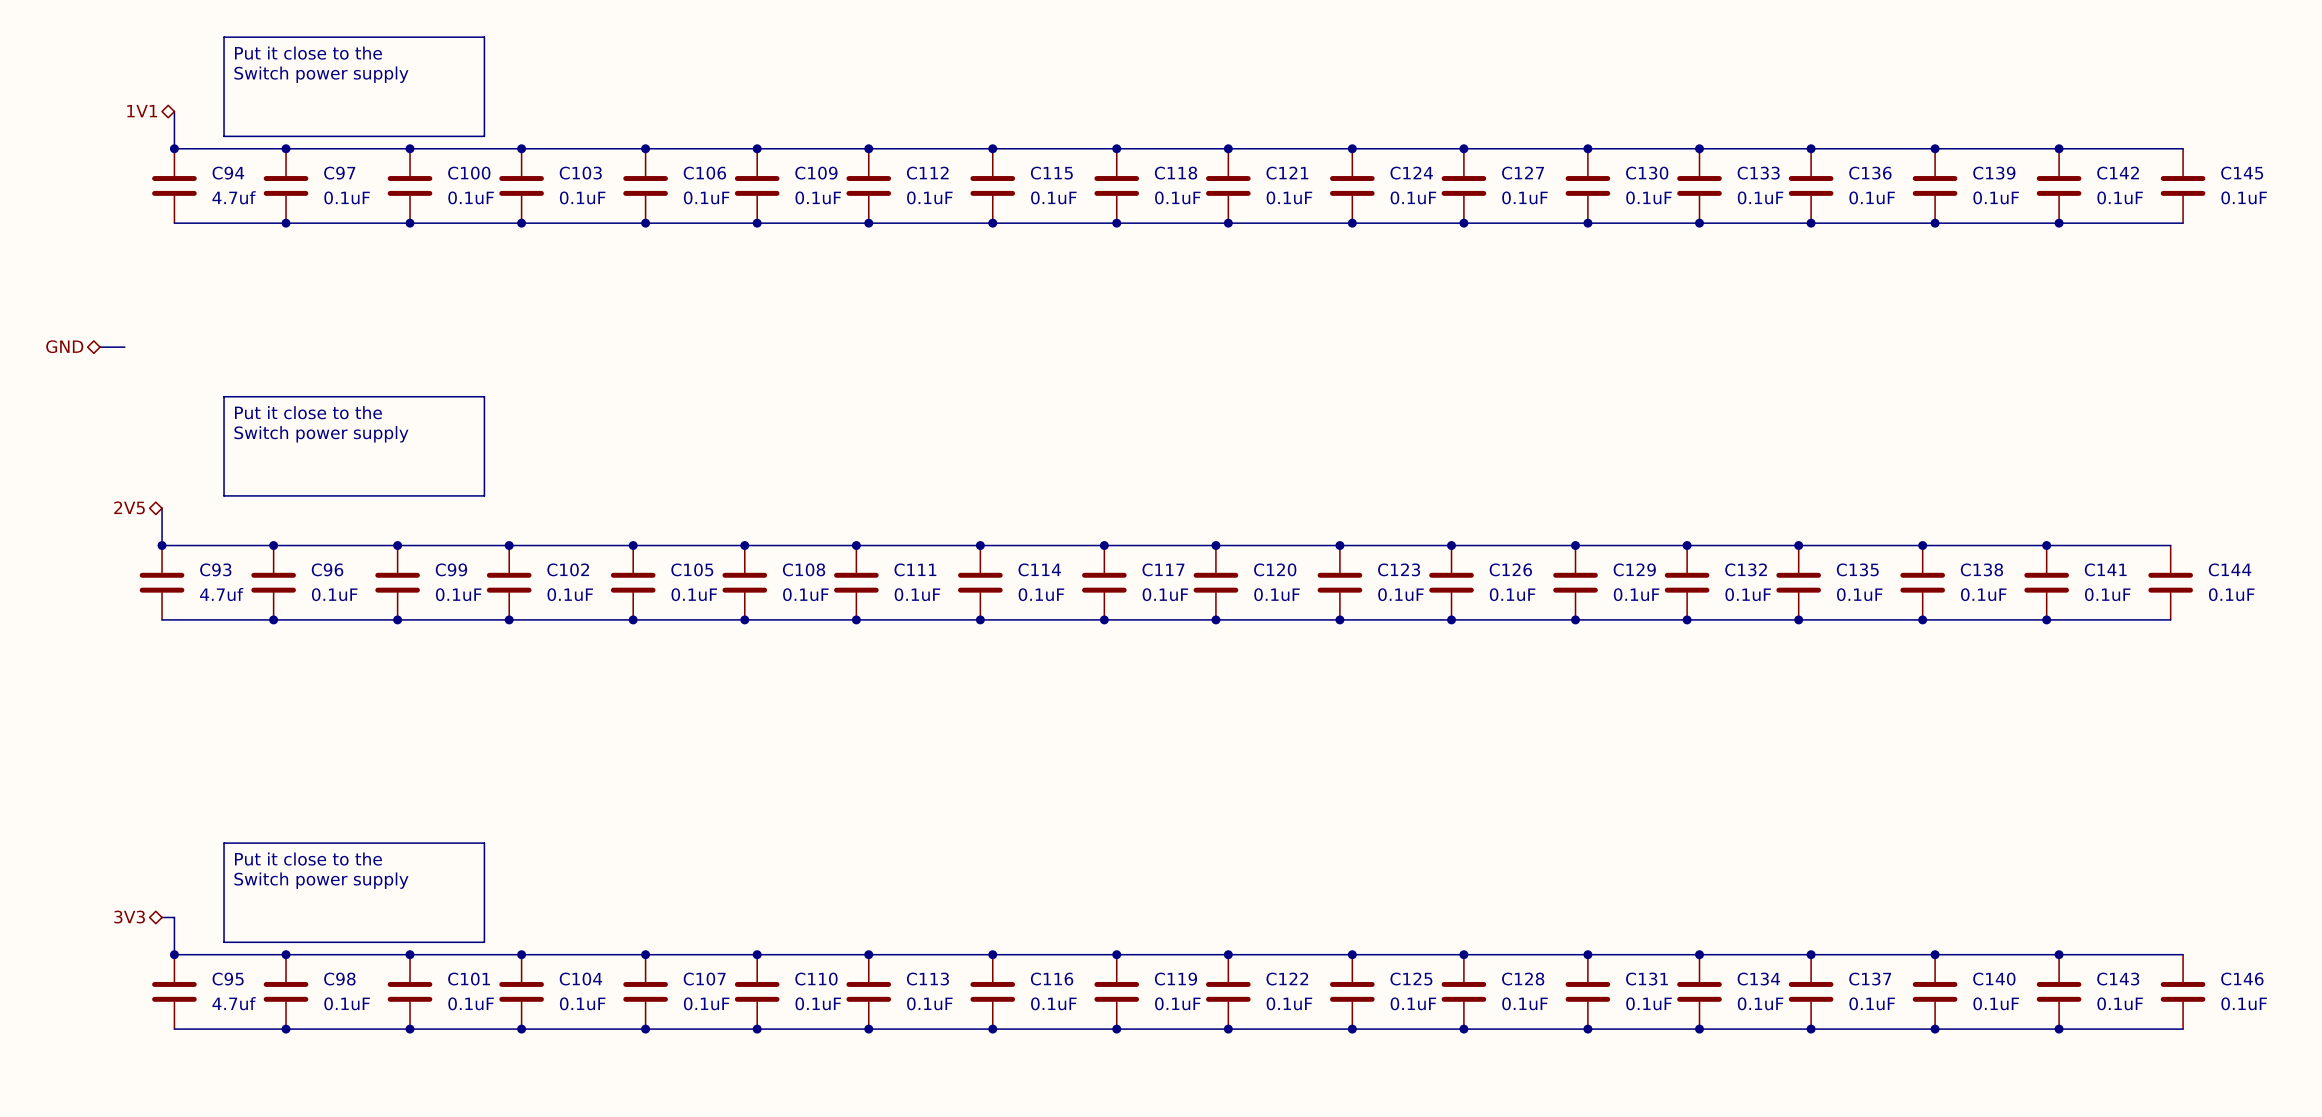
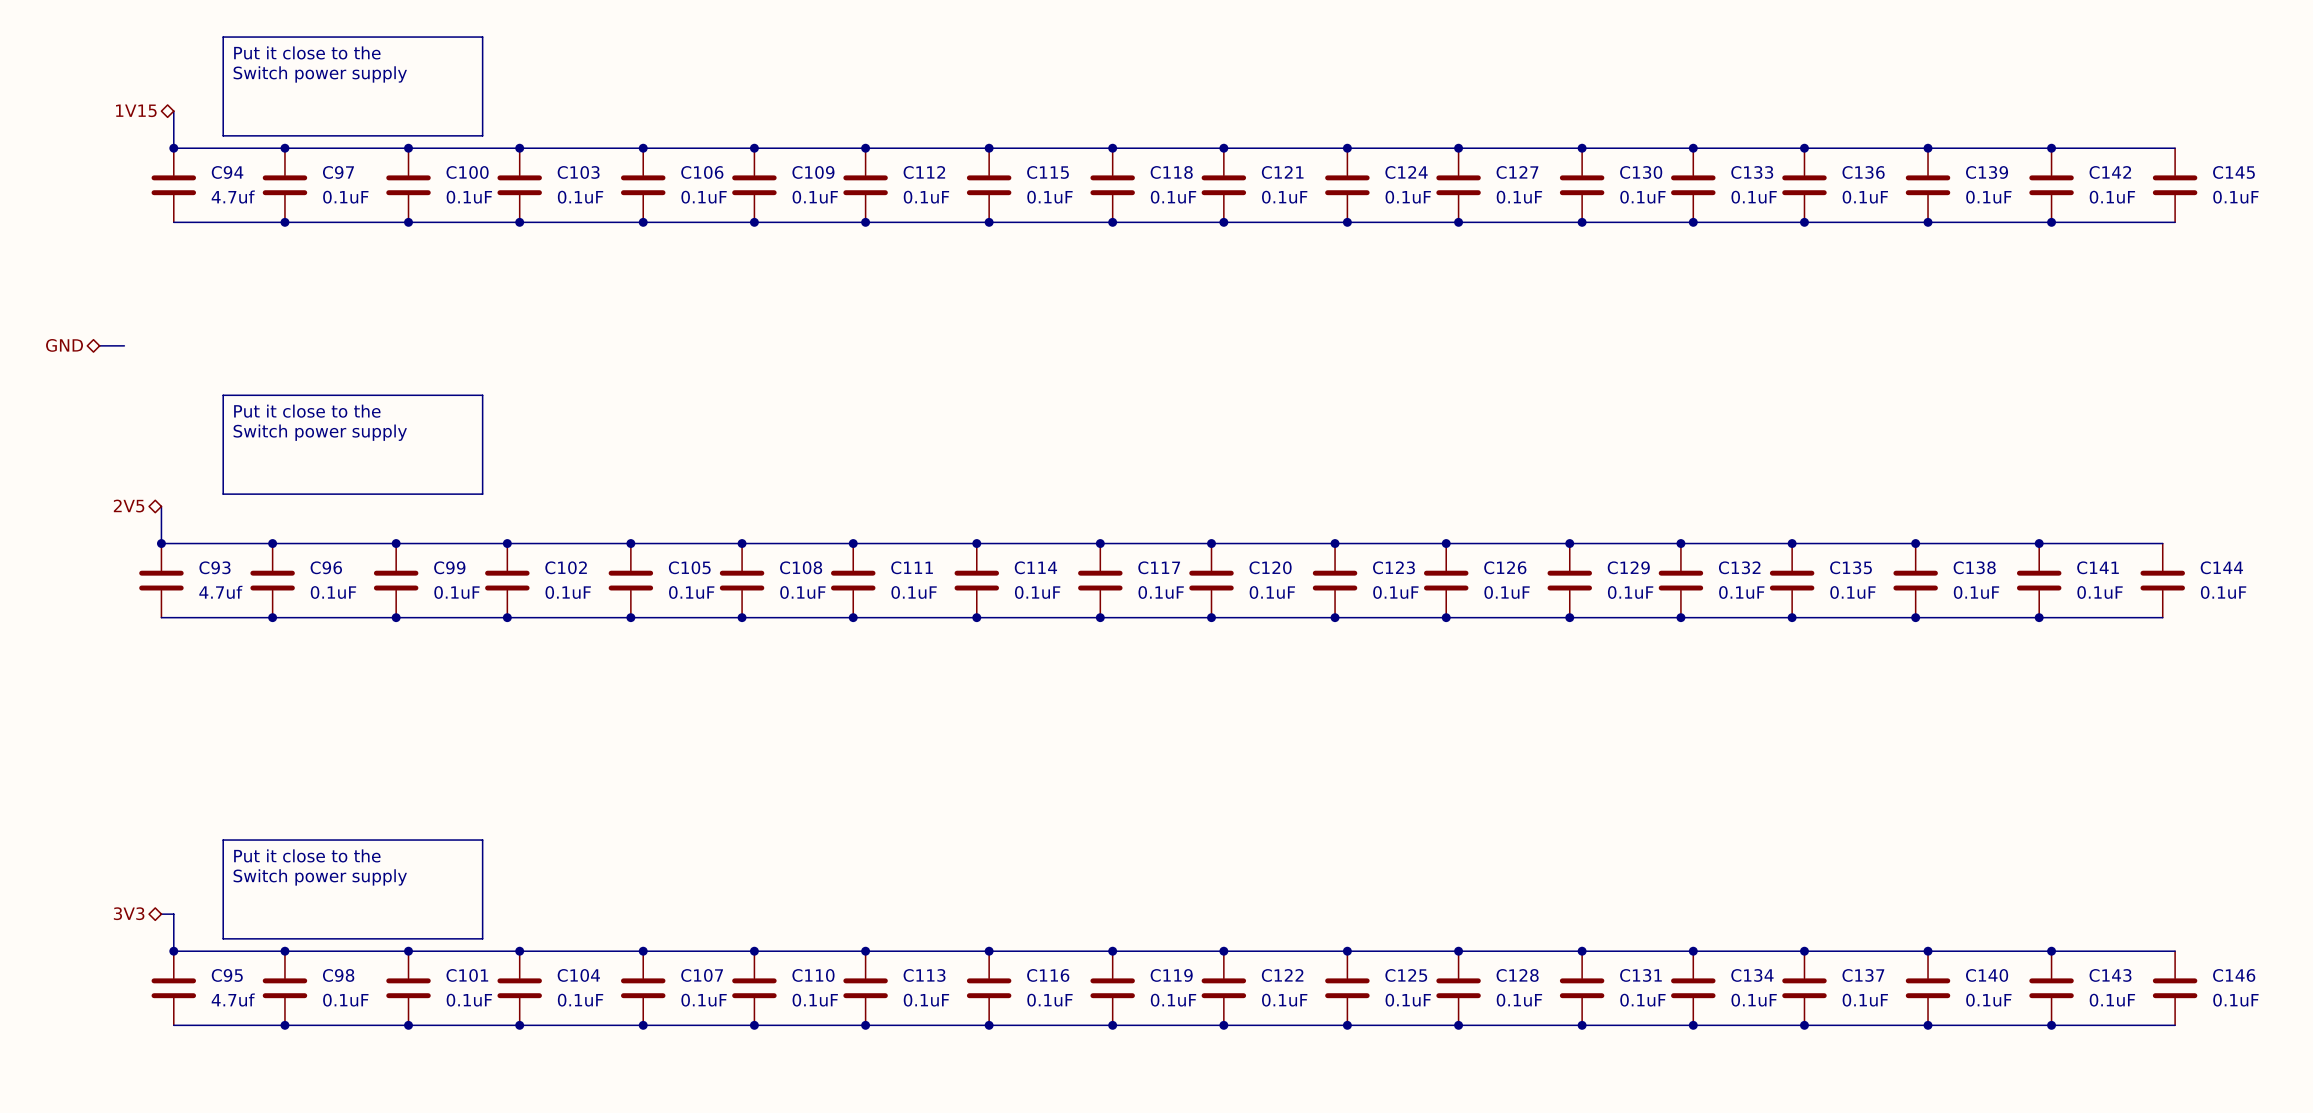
hierarchical label: 1V1 (142, 111) -> 1V15 (136, 110)

